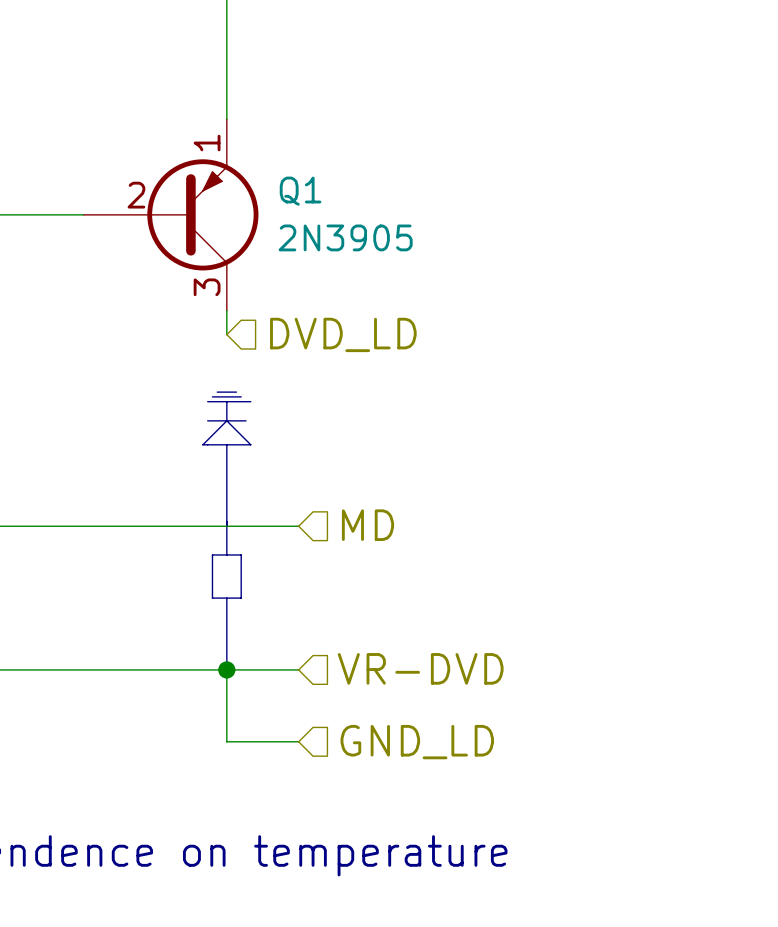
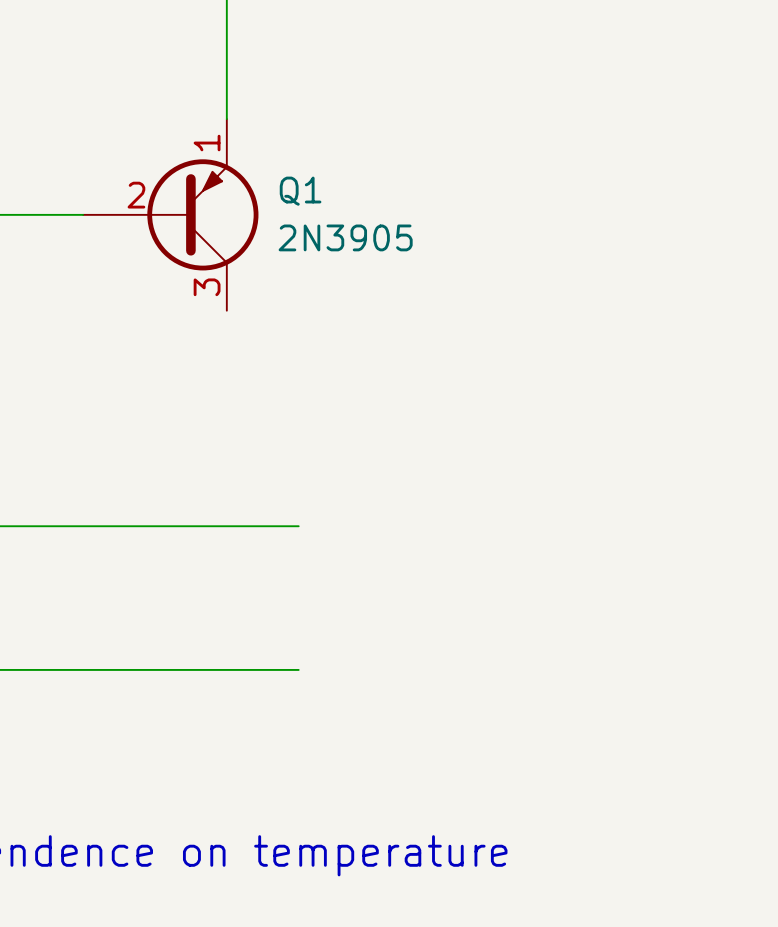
wire: (226, 310) (226, 334) -> none
hierarchical label: DVD_LD (343, 334) -> none
line: (217, 392) (236, 392) -> none
line: (212, 396) (241, 396) -> none
line: (207, 401) (250, 401) -> none
line: (226, 401) (226, 420) -> none
line: (207, 420) (245, 420) -> none
line: (226, 420) (250, 444) (202, 444) (226, 420) -> none
line: (226, 444) (226, 554) -> none
hierarchical label: MD (367, 525) -> none
line: (212, 554) (241, 554) (241, 598) (212, 598) (212, 554) -> none
line: (226, 598) (226, 669) -> none
hierarchical label: VR-DVD (420, 668) -> none
wire: (226, 669) (226, 741) (298, 741) -> none
junction: (226, 669) -> none
hierarchical label: GND_LD (417, 742) -> none

